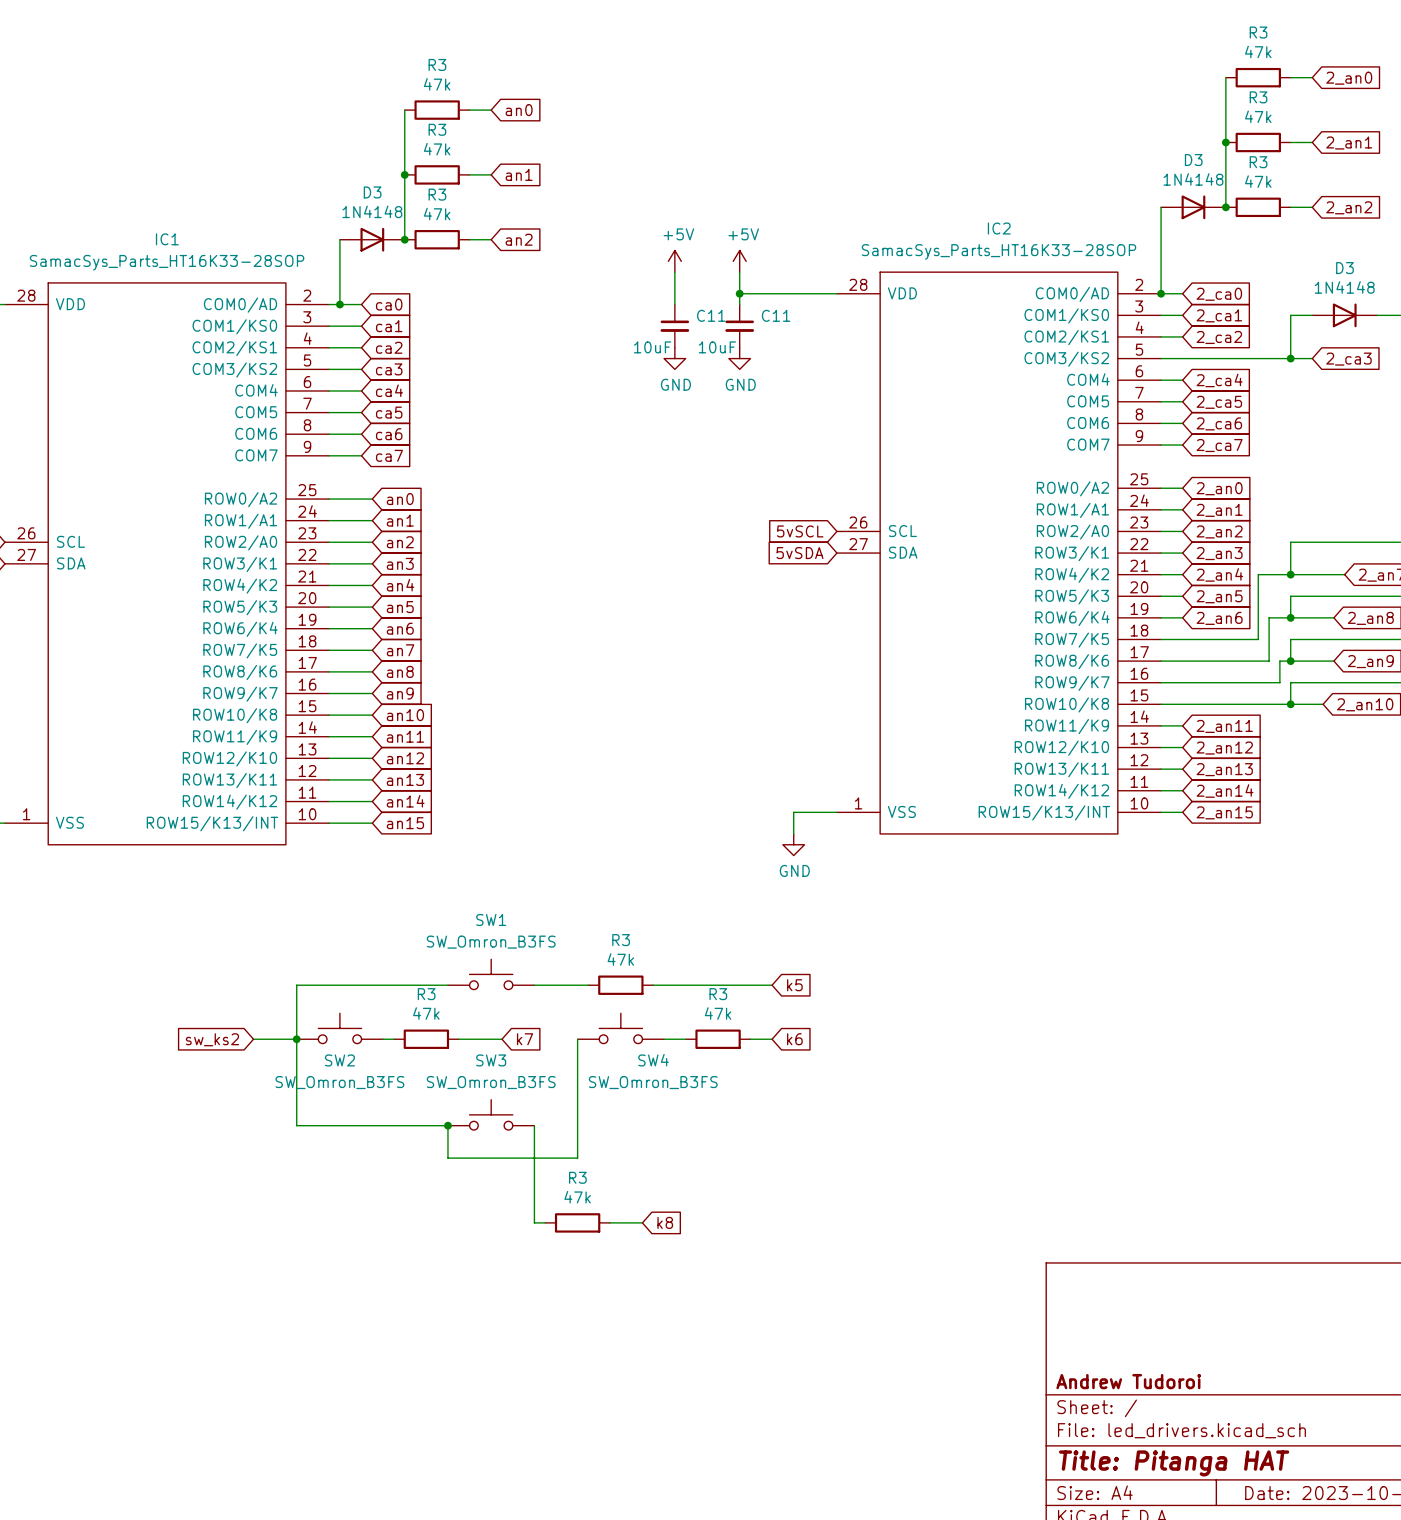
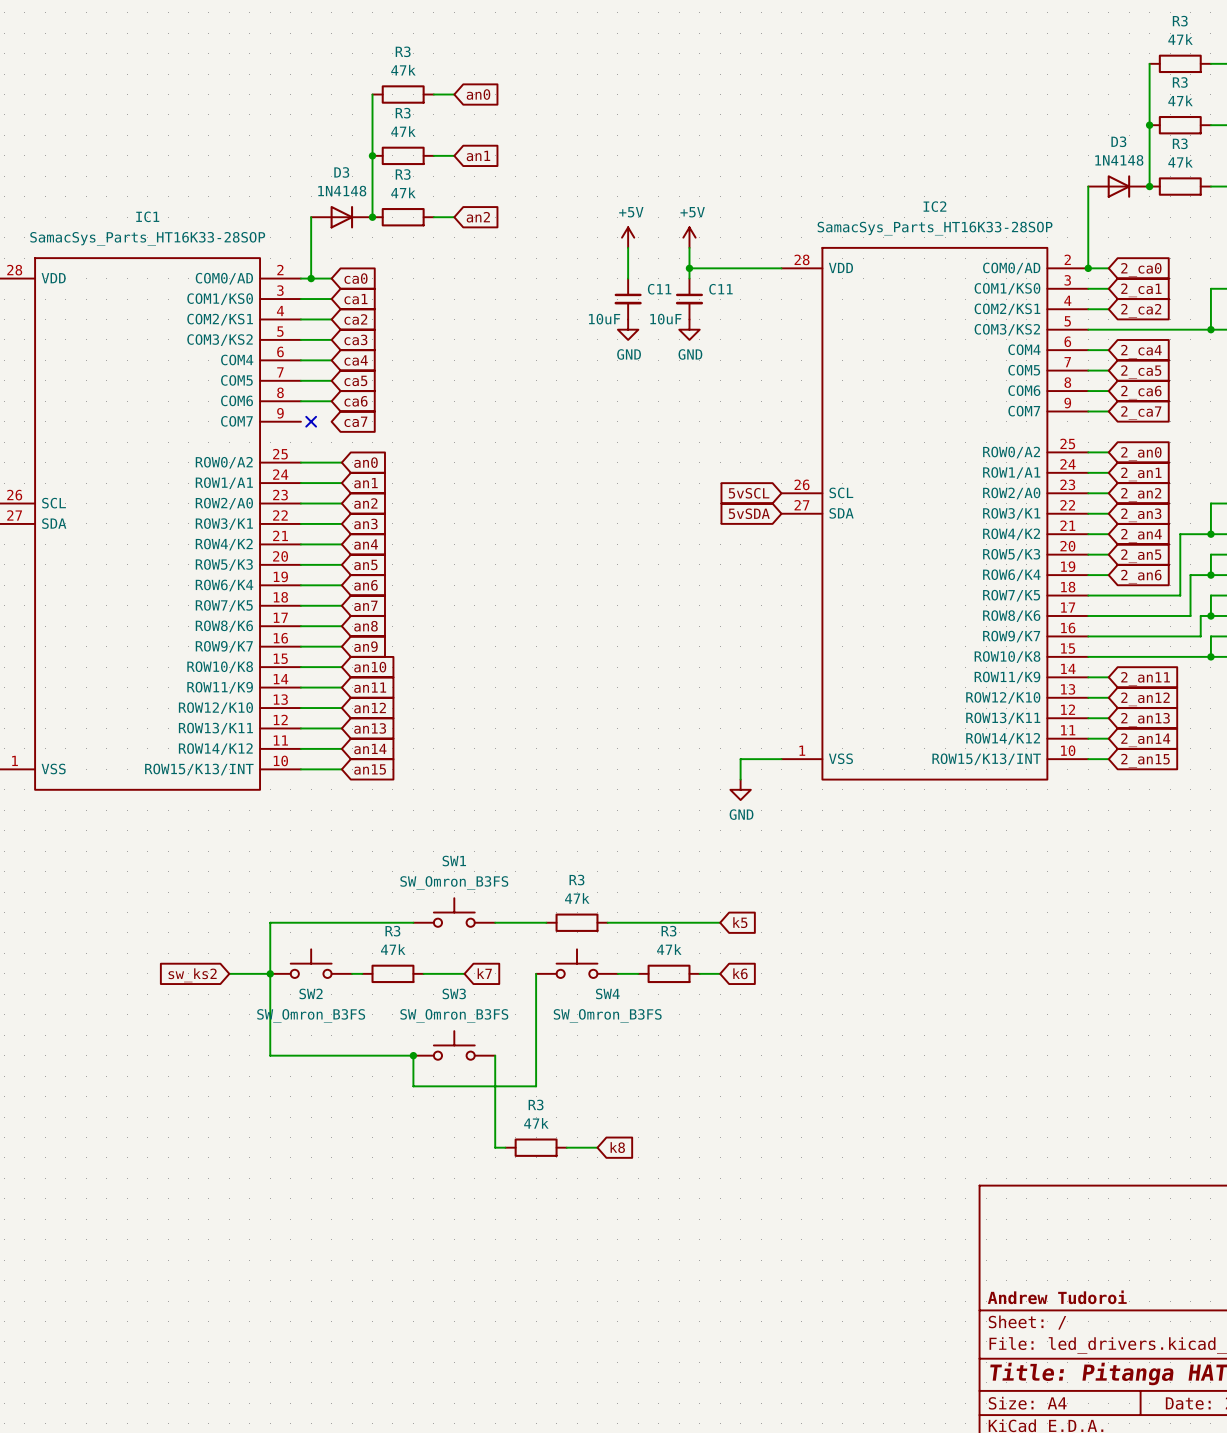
wire: (329, 455) (361, 455) -> none
no-connect mark: none -> (311, 421)

